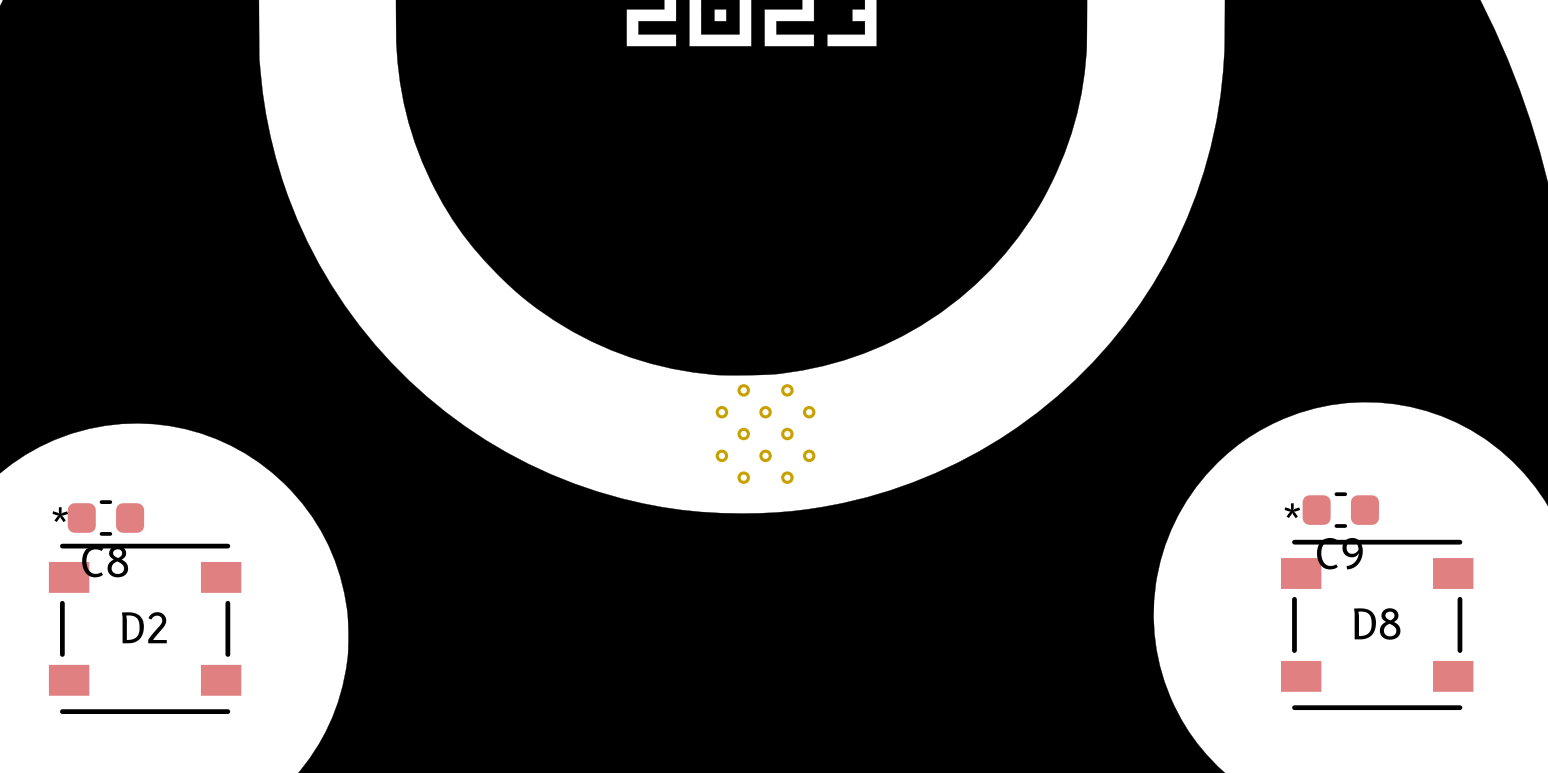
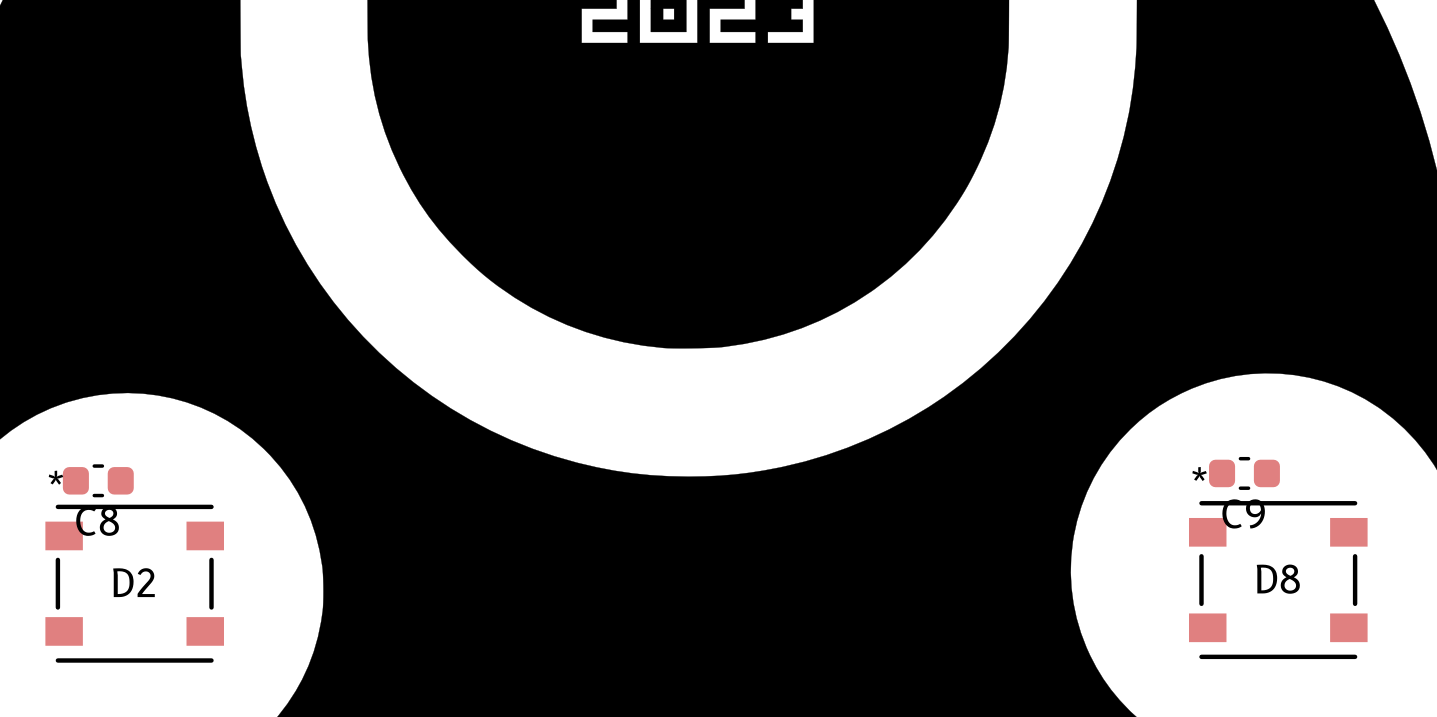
part: (765, 434) -> none

